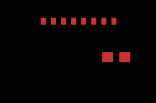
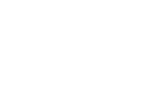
part: (78, 21) -> none
part: (116, 57) -> none

